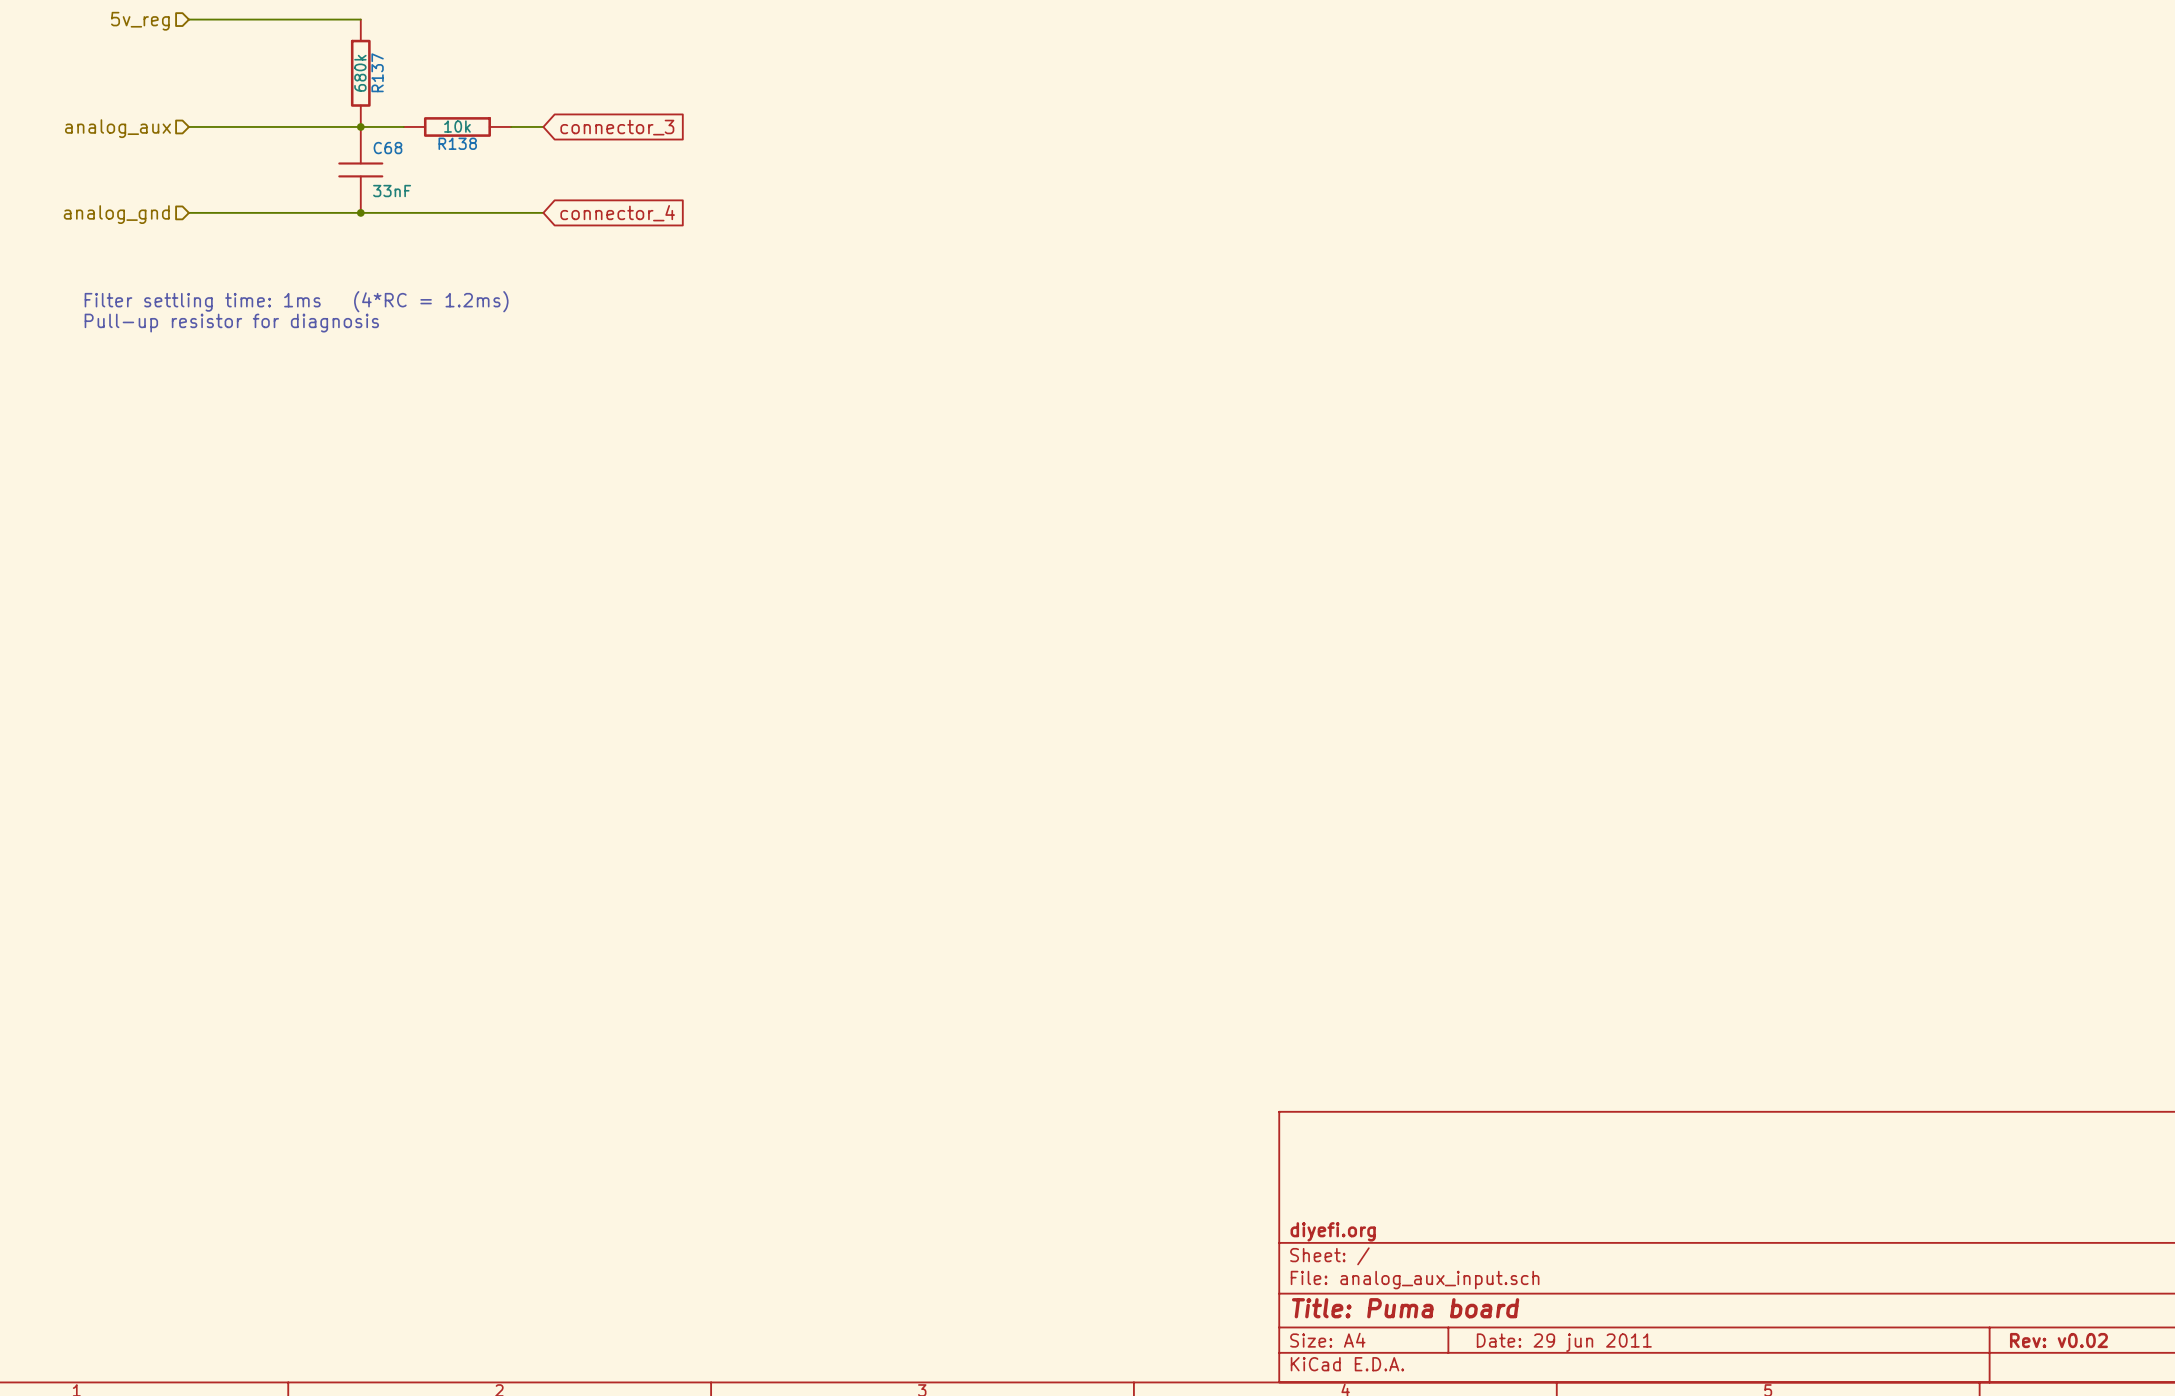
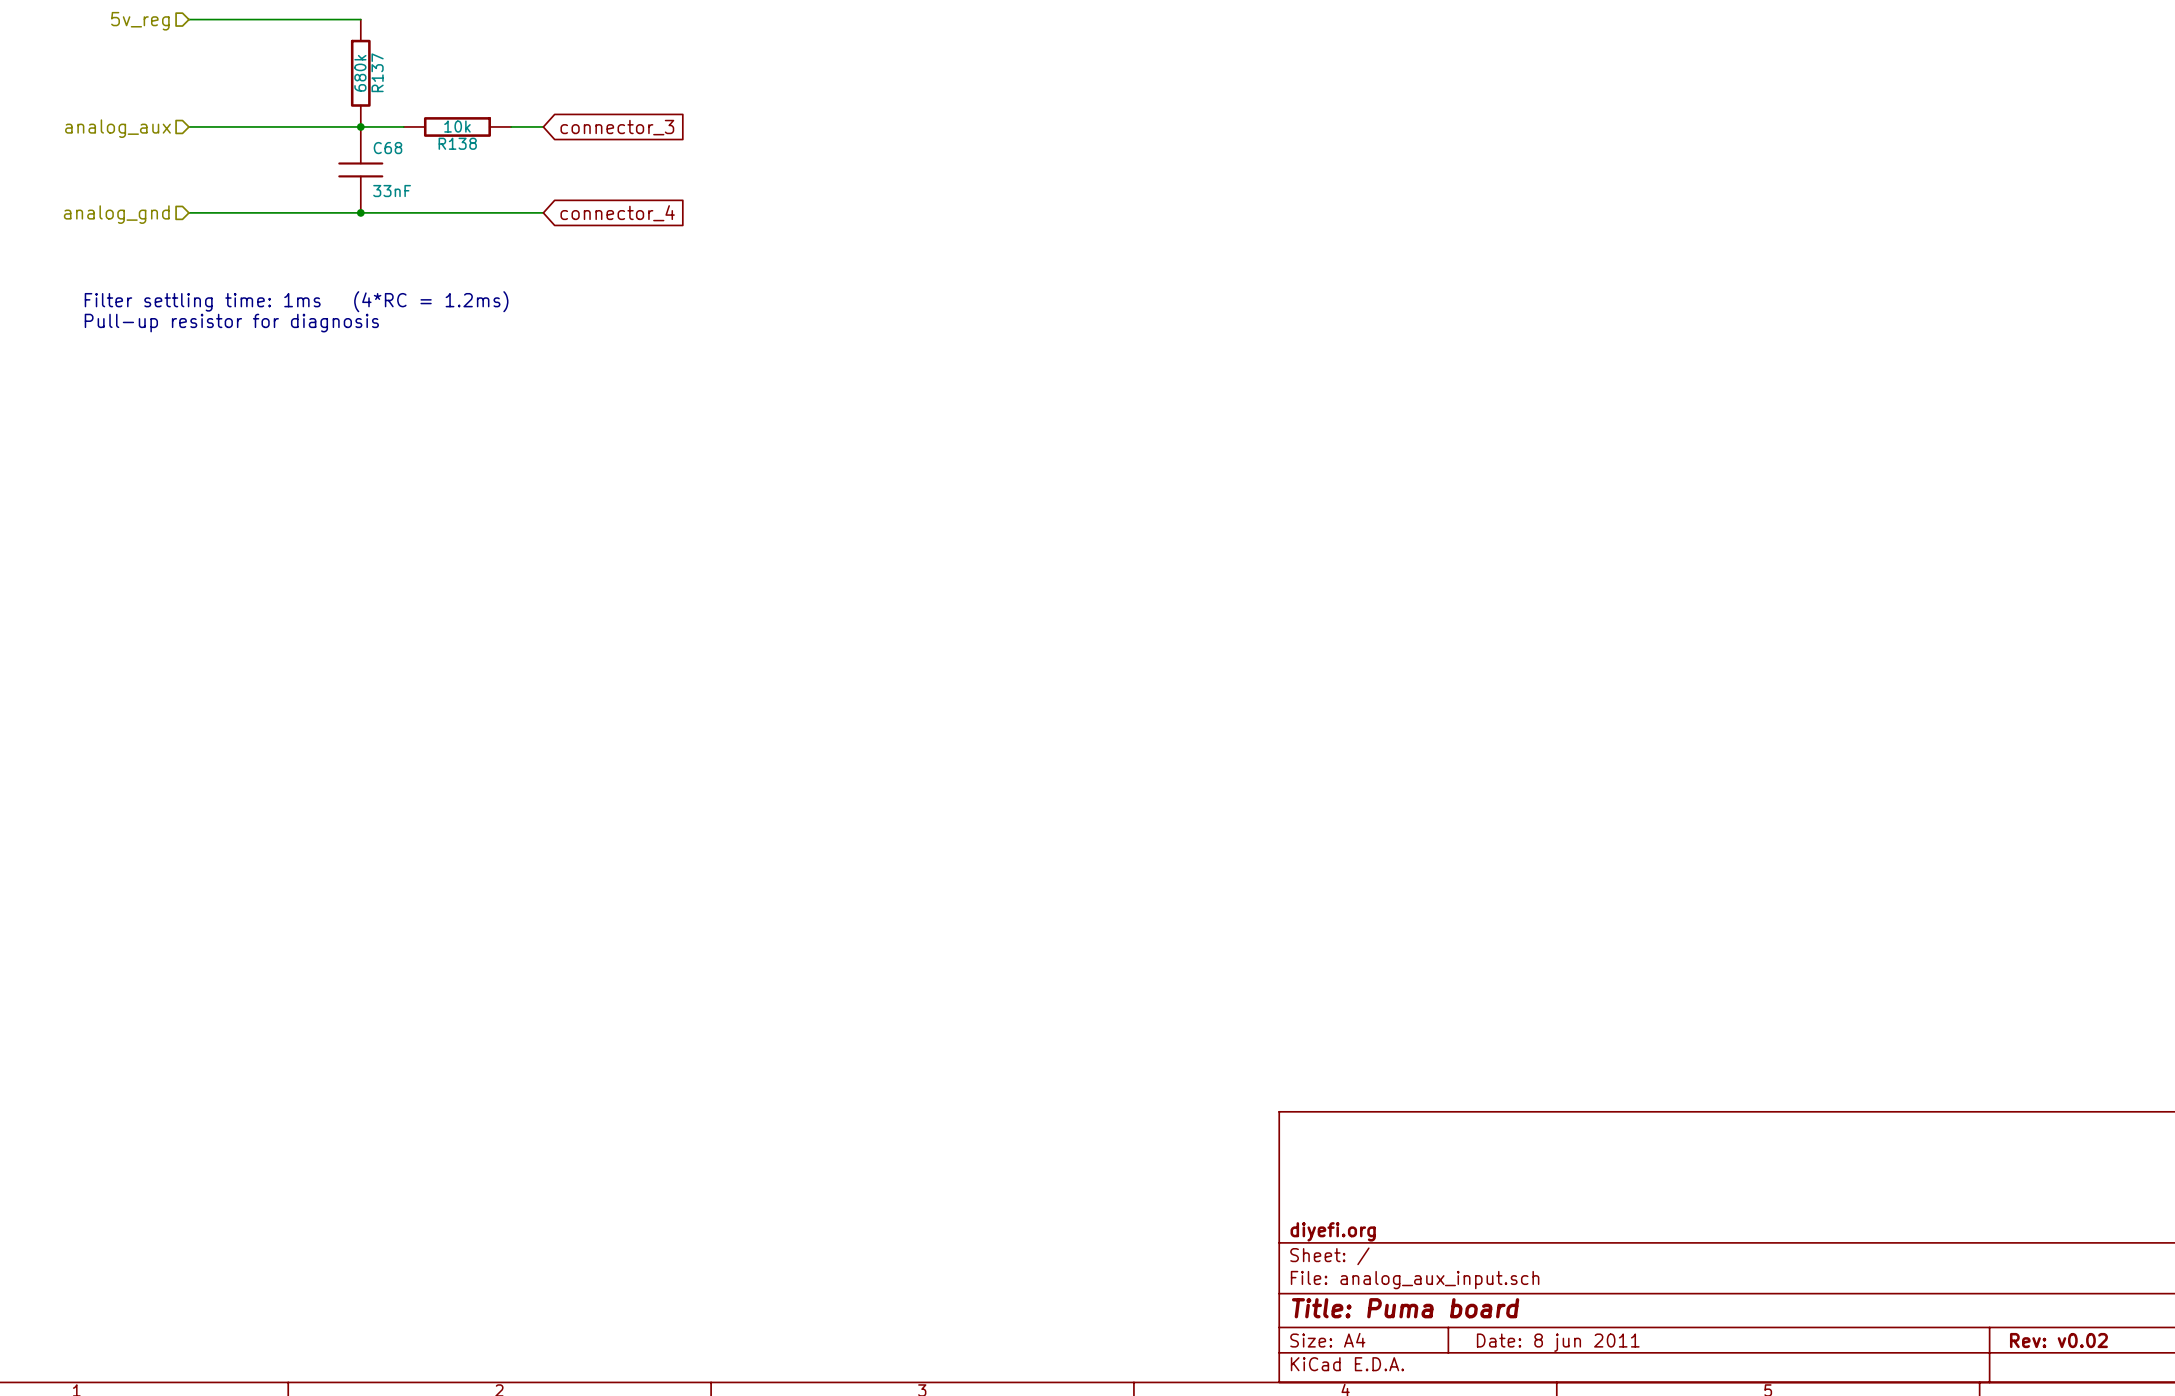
title block: Date: 29 jun 2011 (1564, 1342) -> Date: 8 jun 2011 (1558, 1342)

